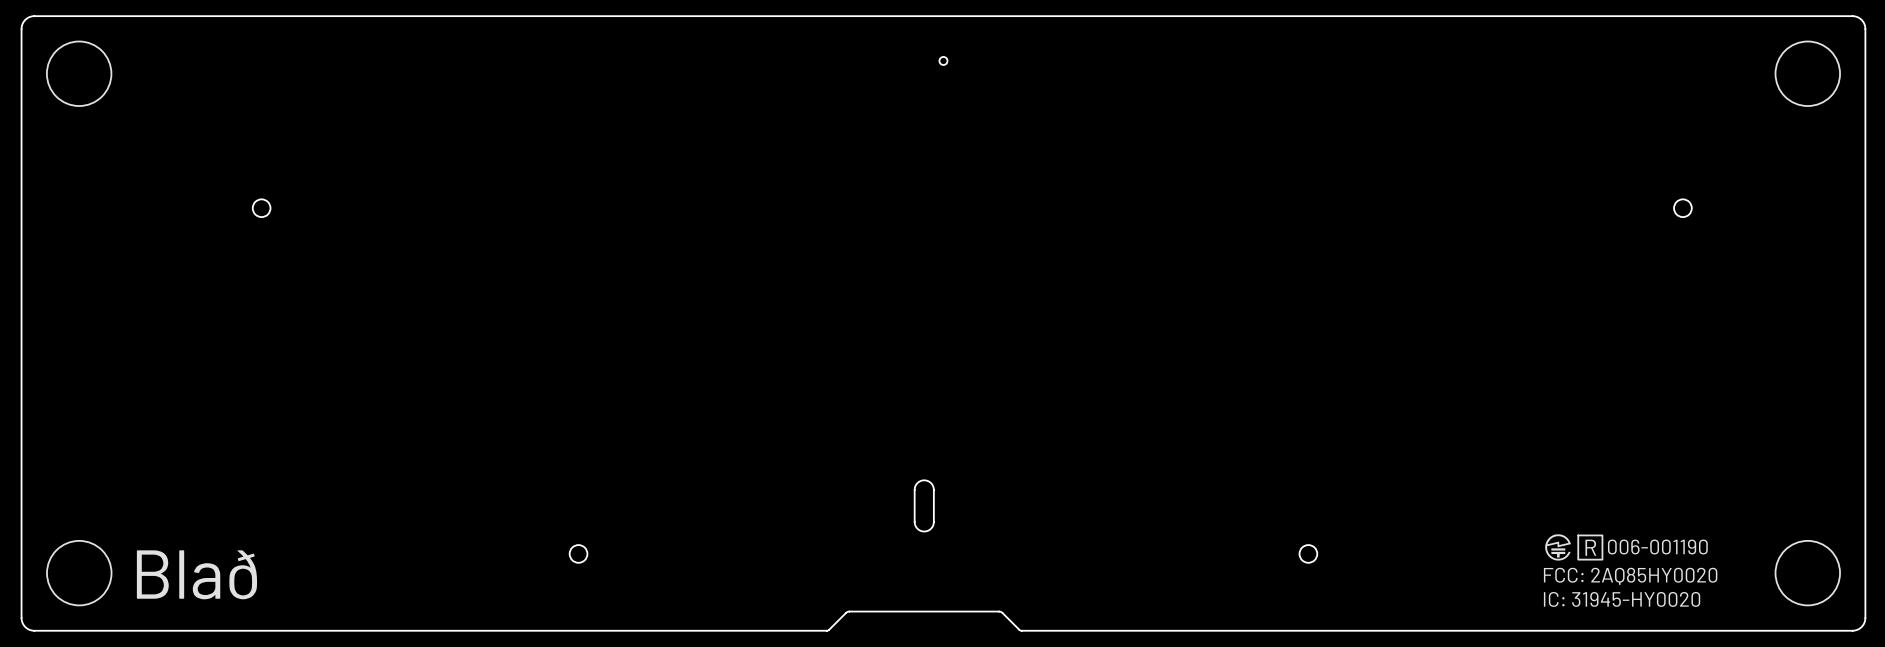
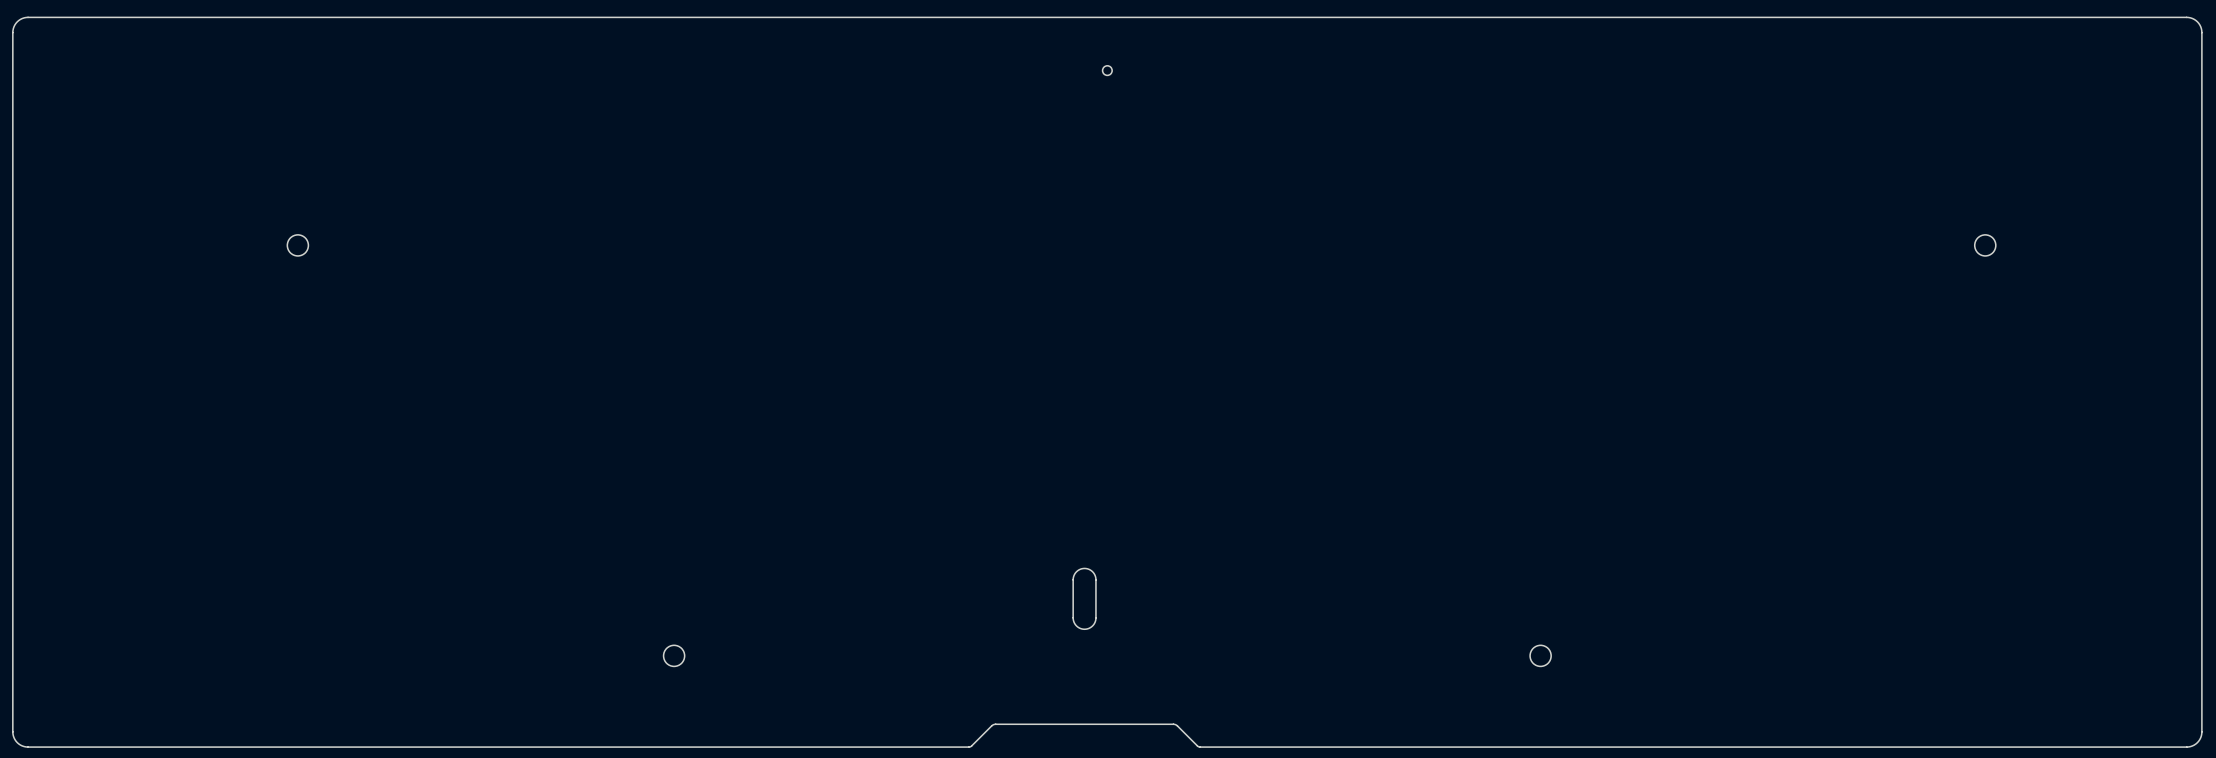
drawing: [46, 41, 112, 107] -> none
drawing: [1775, 41, 1841, 107] -> none
drawing: [1545, 534, 1841, 606] -> none
drawing: [46, 540, 112, 606] -> none
text: Blað (196, 574) -> none

